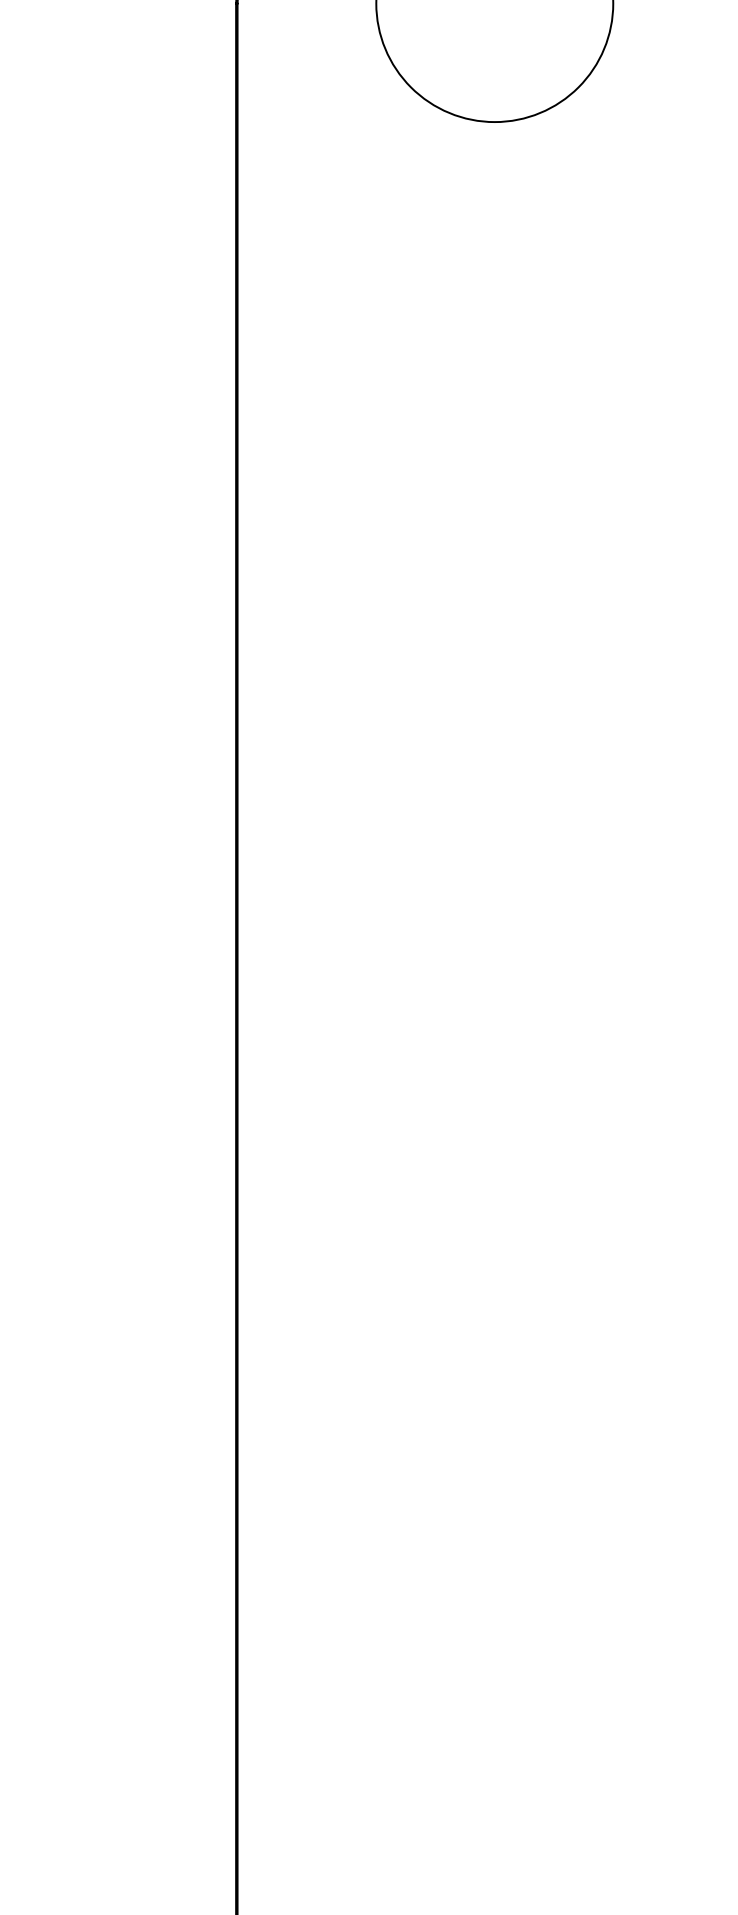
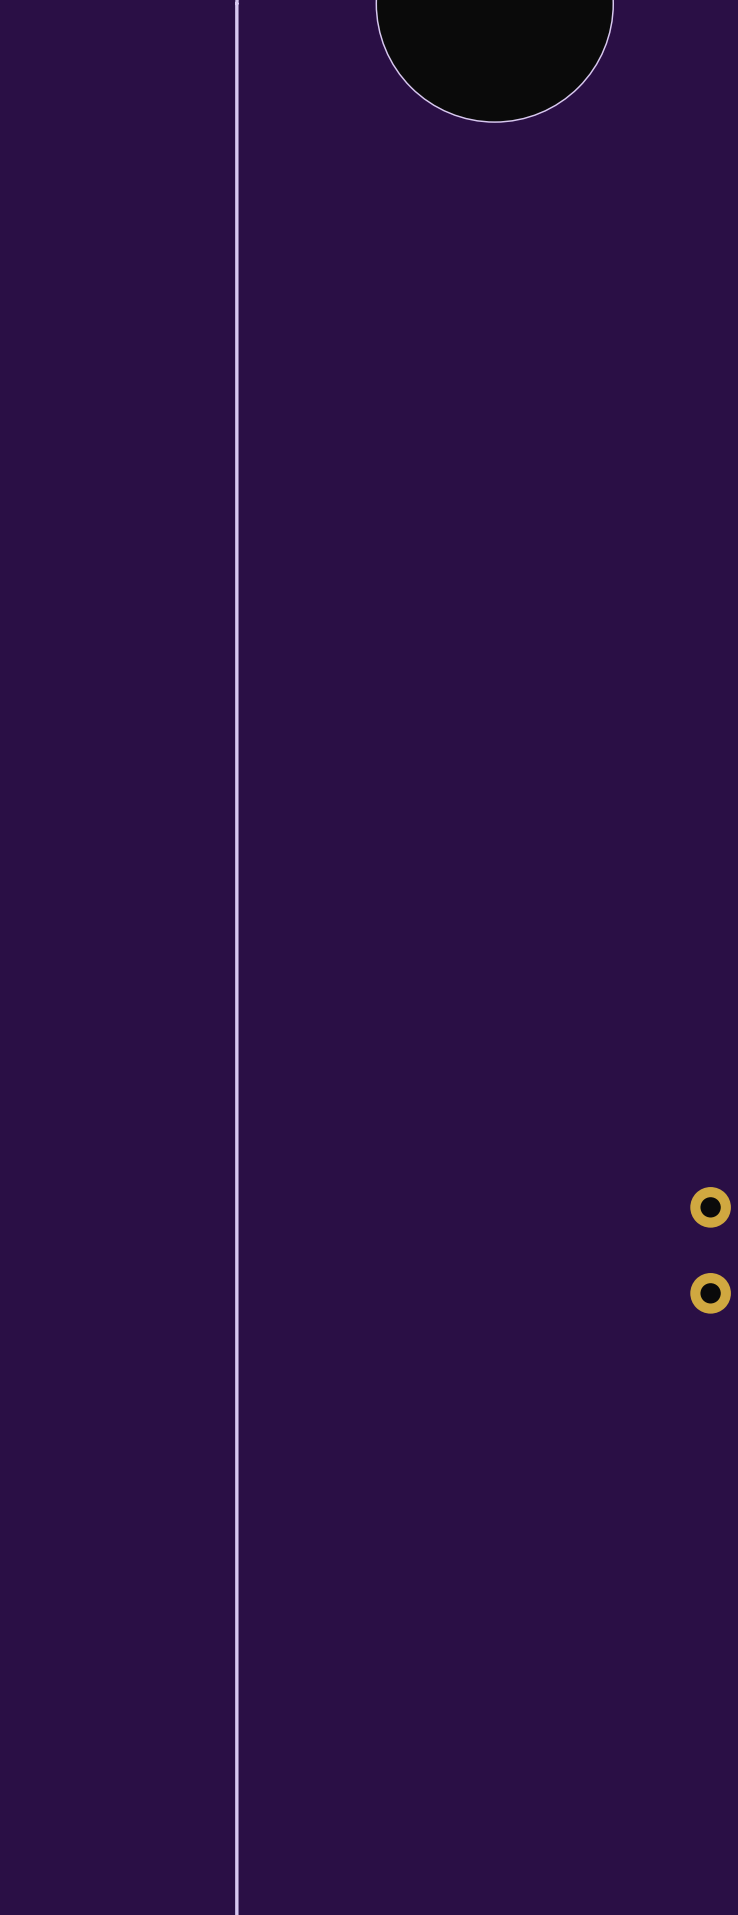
via: none -> (710, 1207)
via: none -> (710, 1293)

